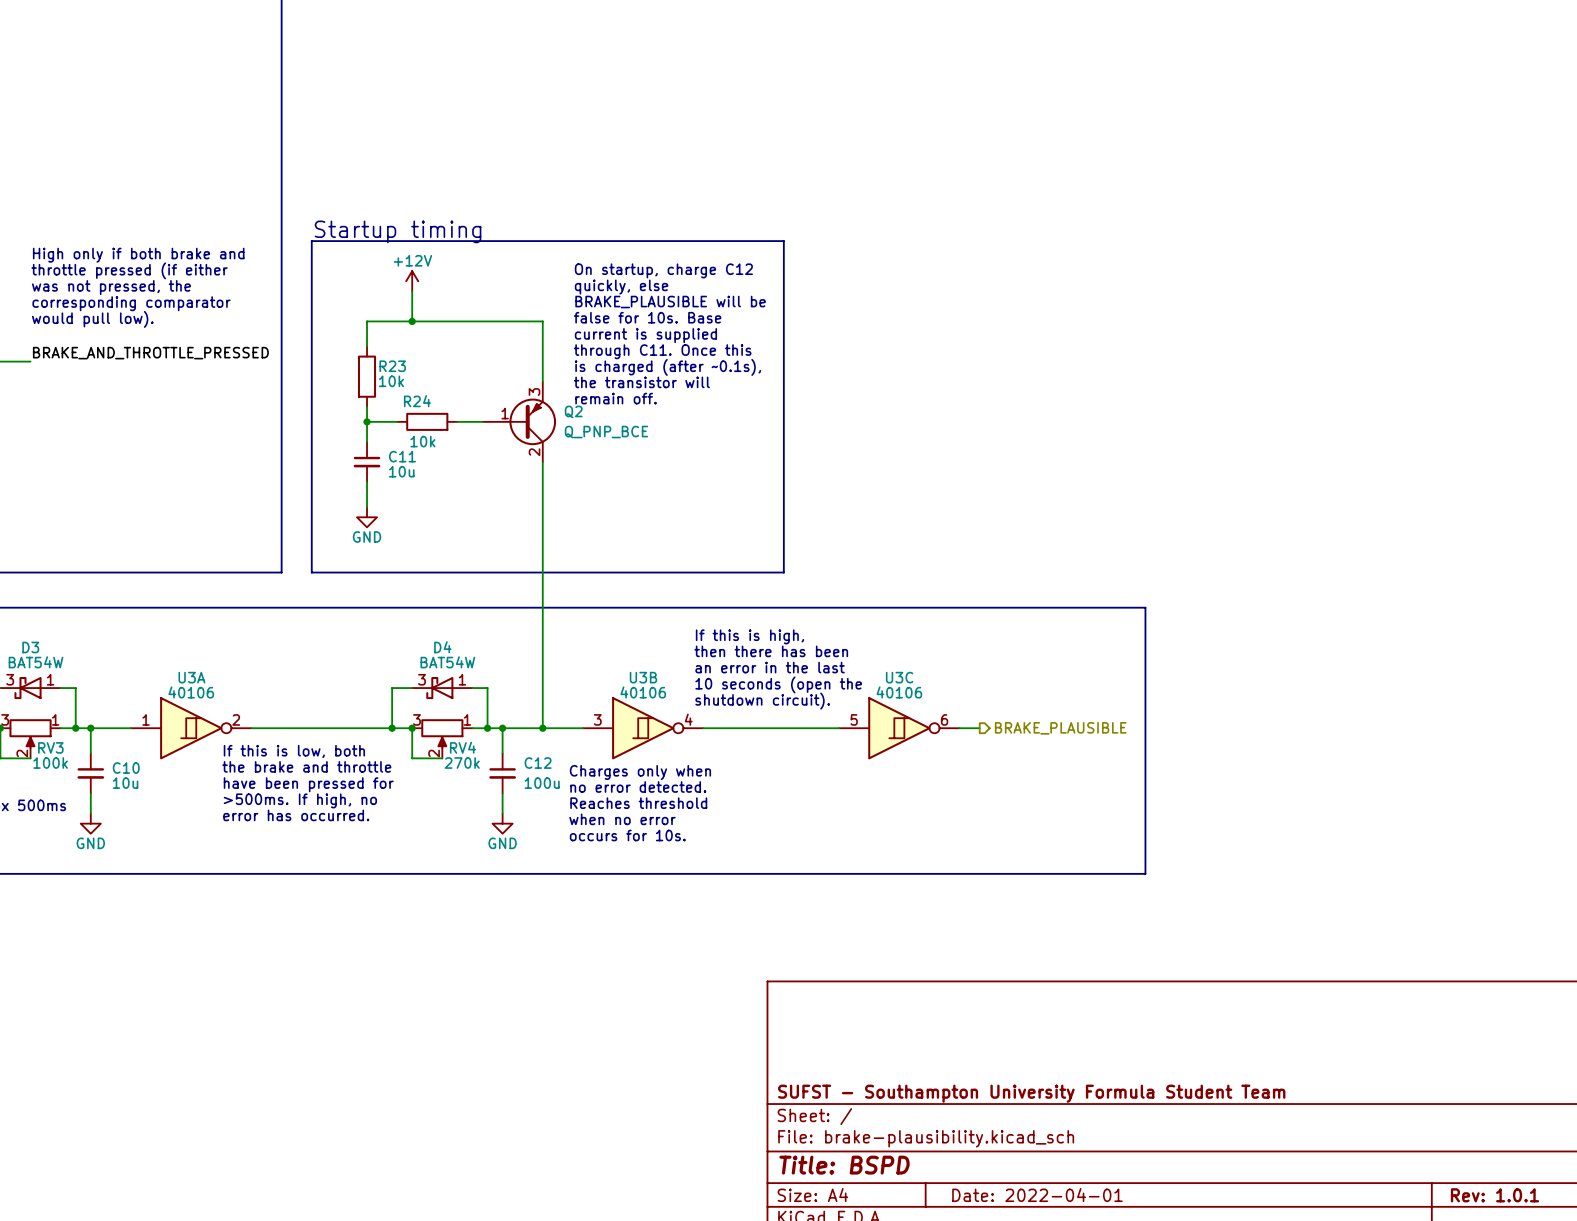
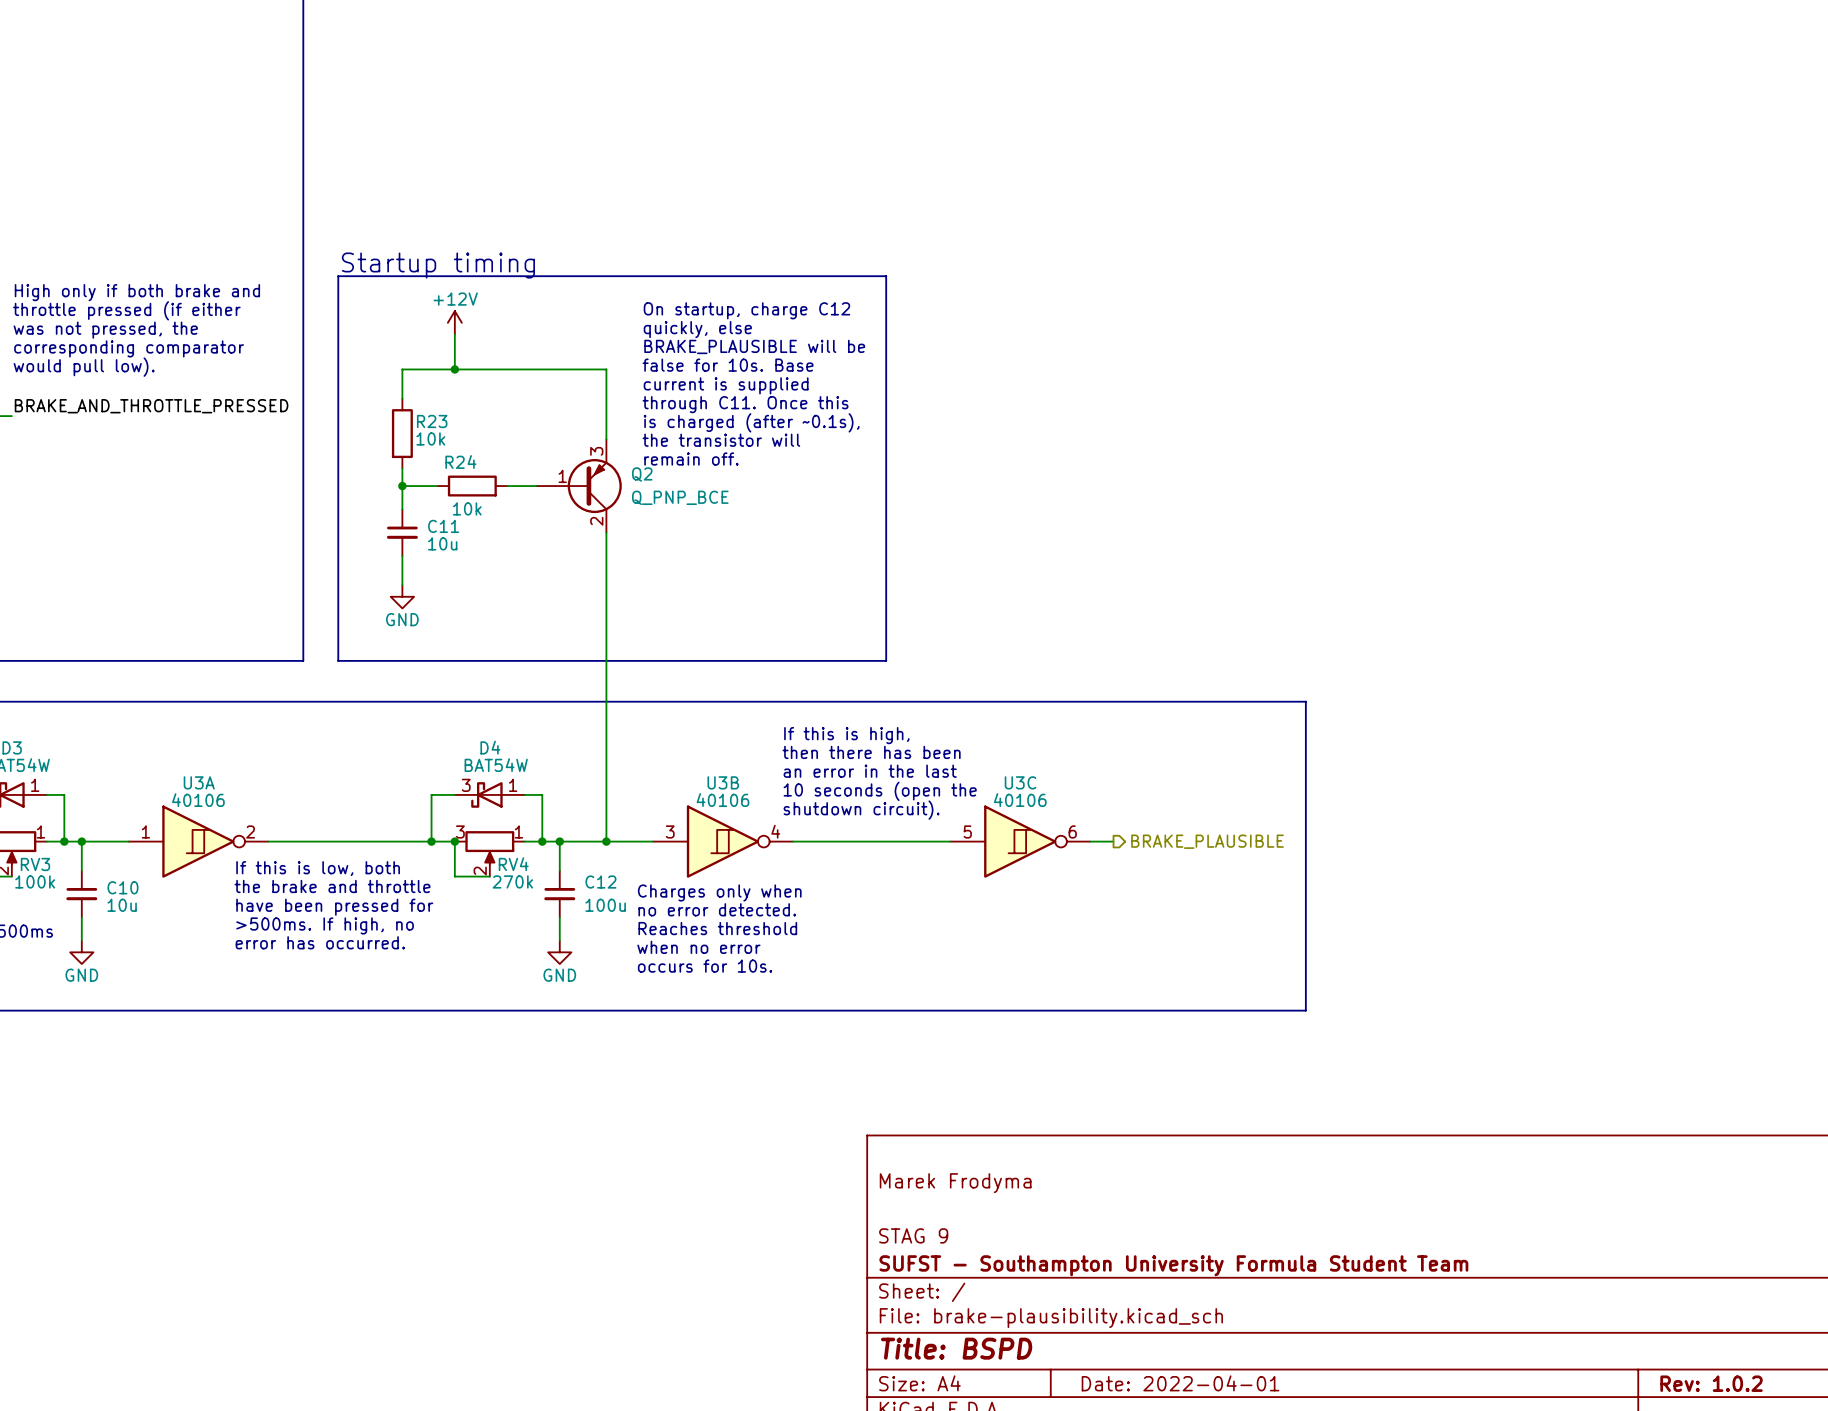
title block: none -> Marek Frodyma (955, 1183)
title block: none -> STAG 9 (913, 1235)
title block: Rev: 1.0.1 (1494, 1195) -> Rev: 1.0.2 (1711, 1383)

